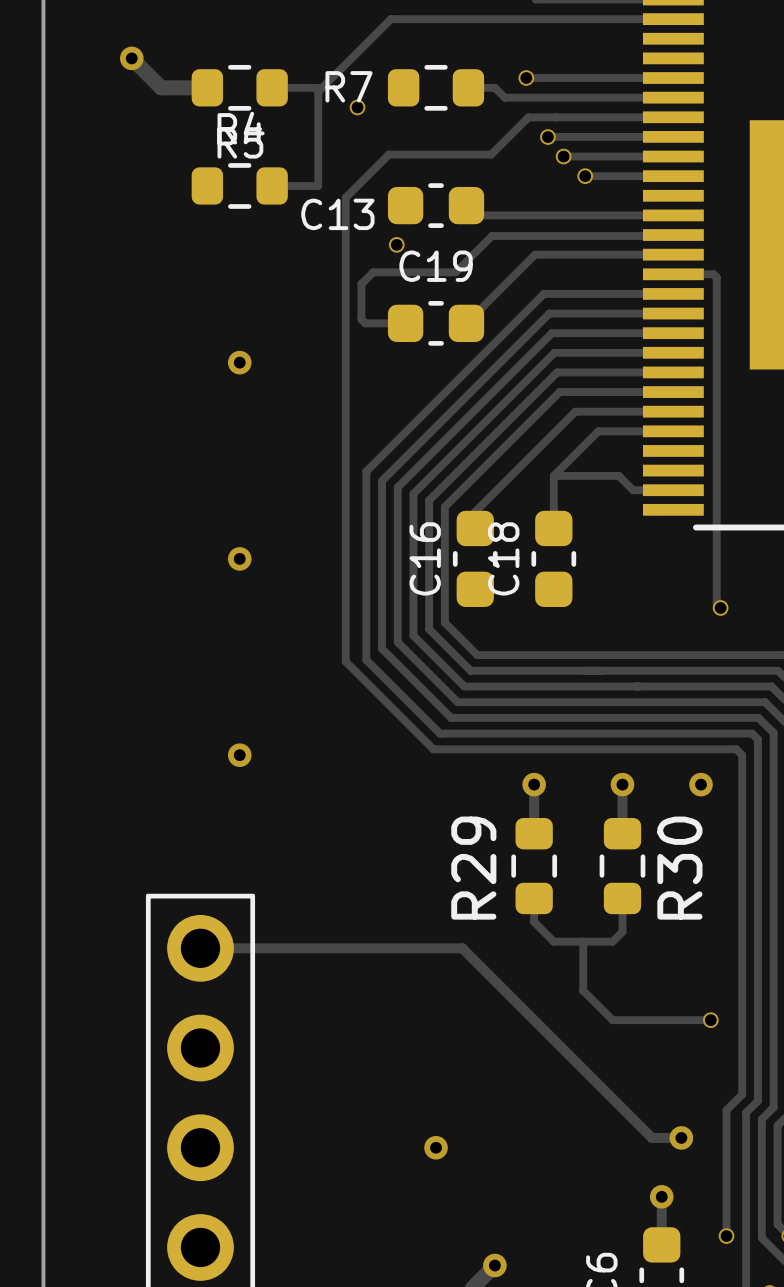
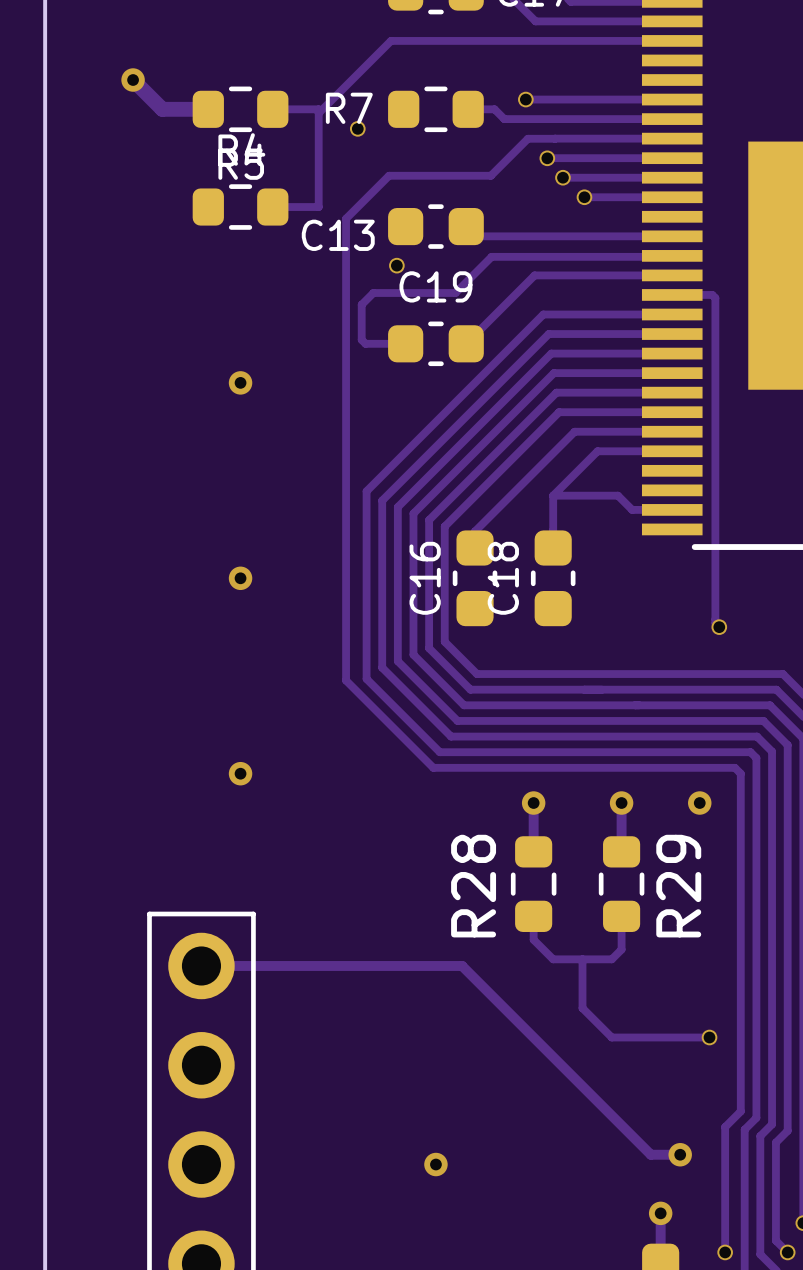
R29 name: R29 (473, 868) -> R28 (473, 886)
R30 name: R30 (679, 868) -> R29 (678, 886)

